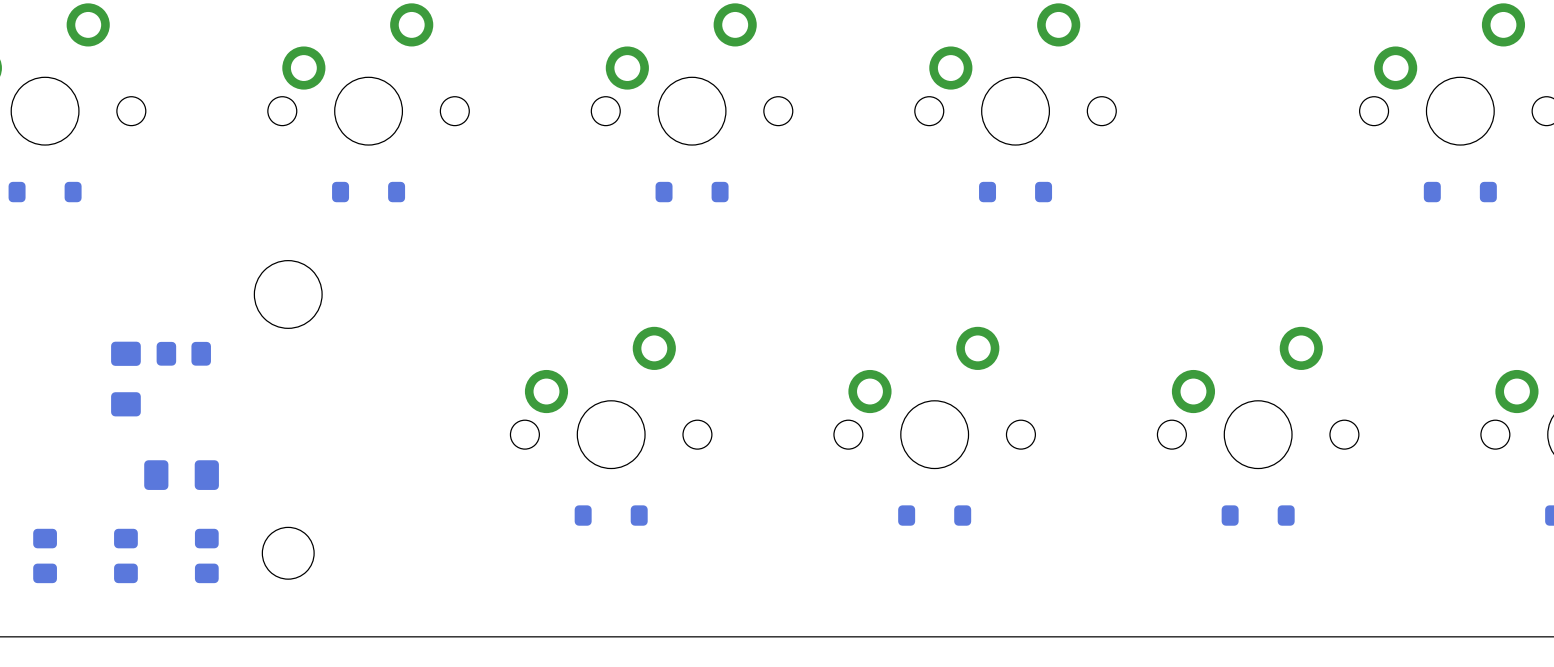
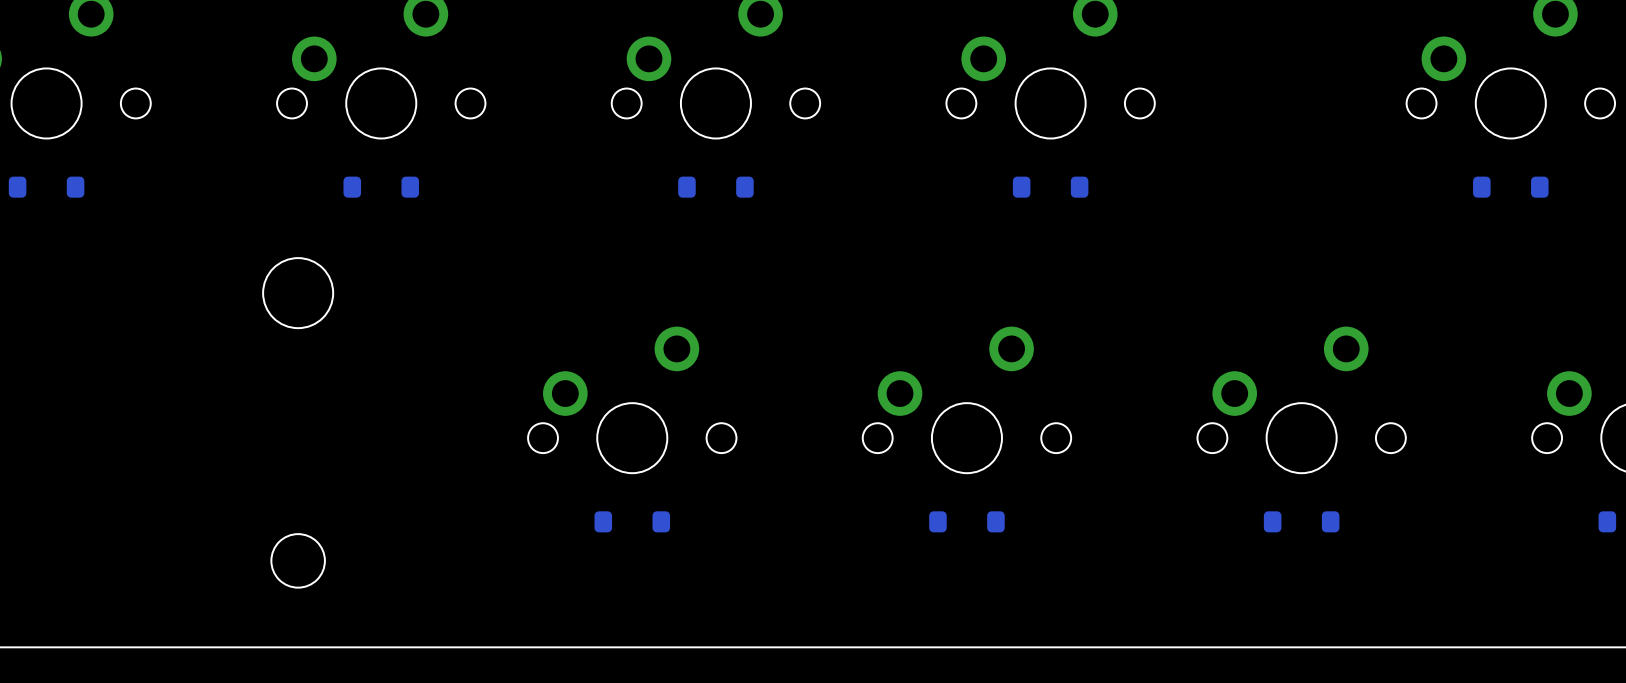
part: (183, 353) -> none
part: (125, 379) -> none
part: (181, 475) -> none
part: (45, 555) -> none
part: (125, 555) -> none
part: (206, 555) -> none

